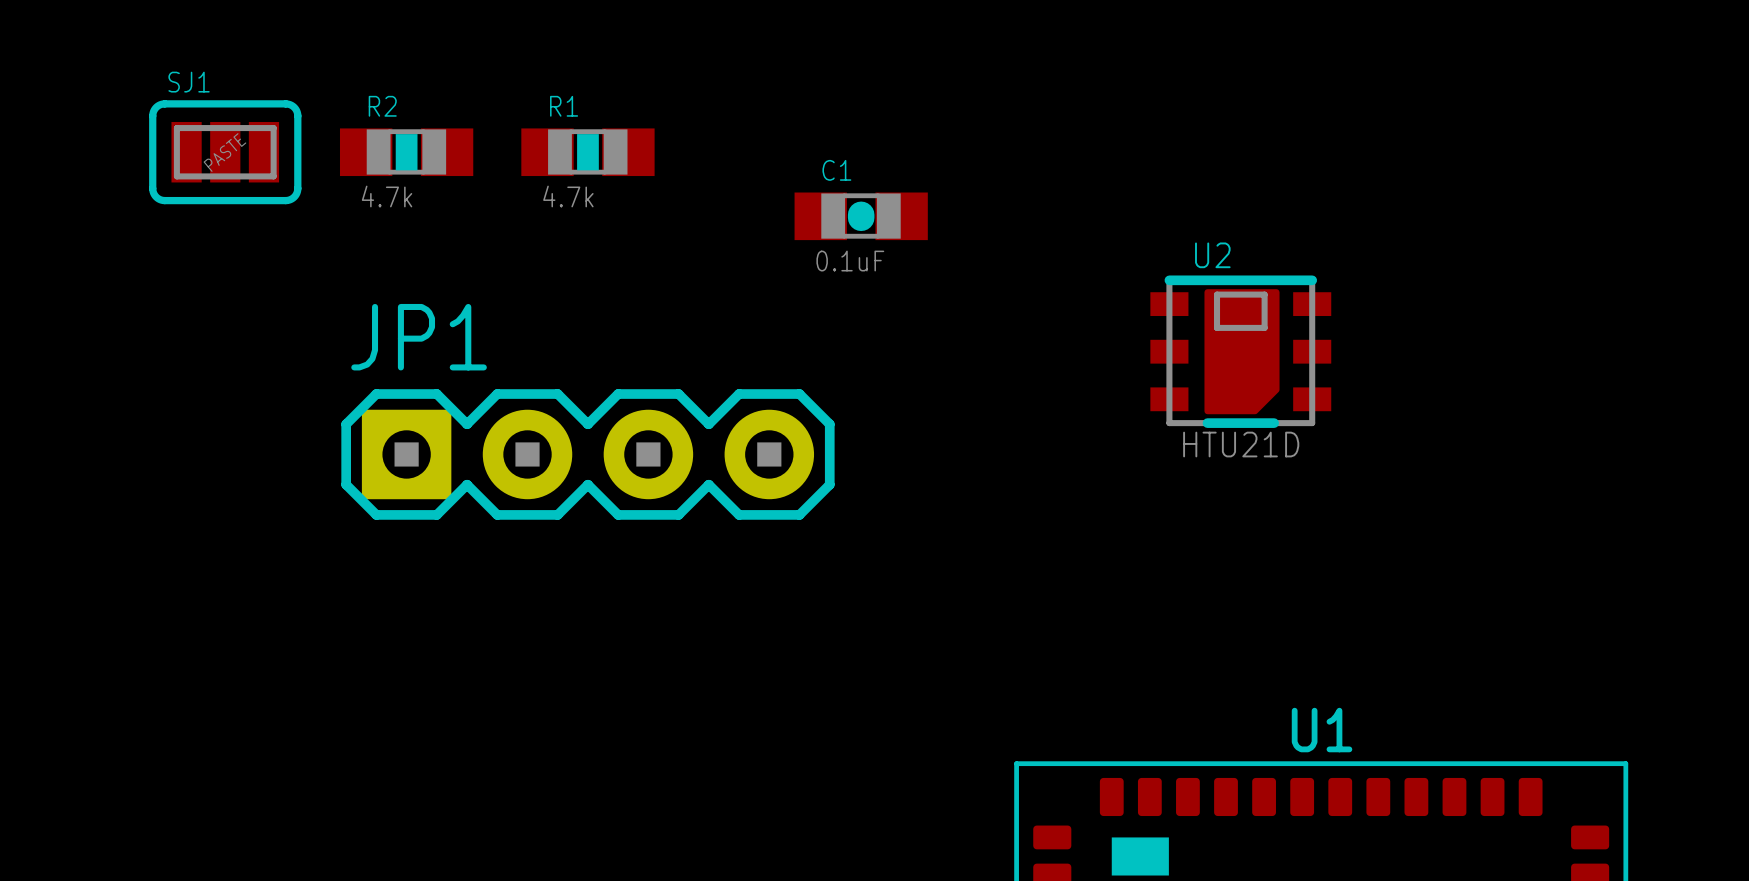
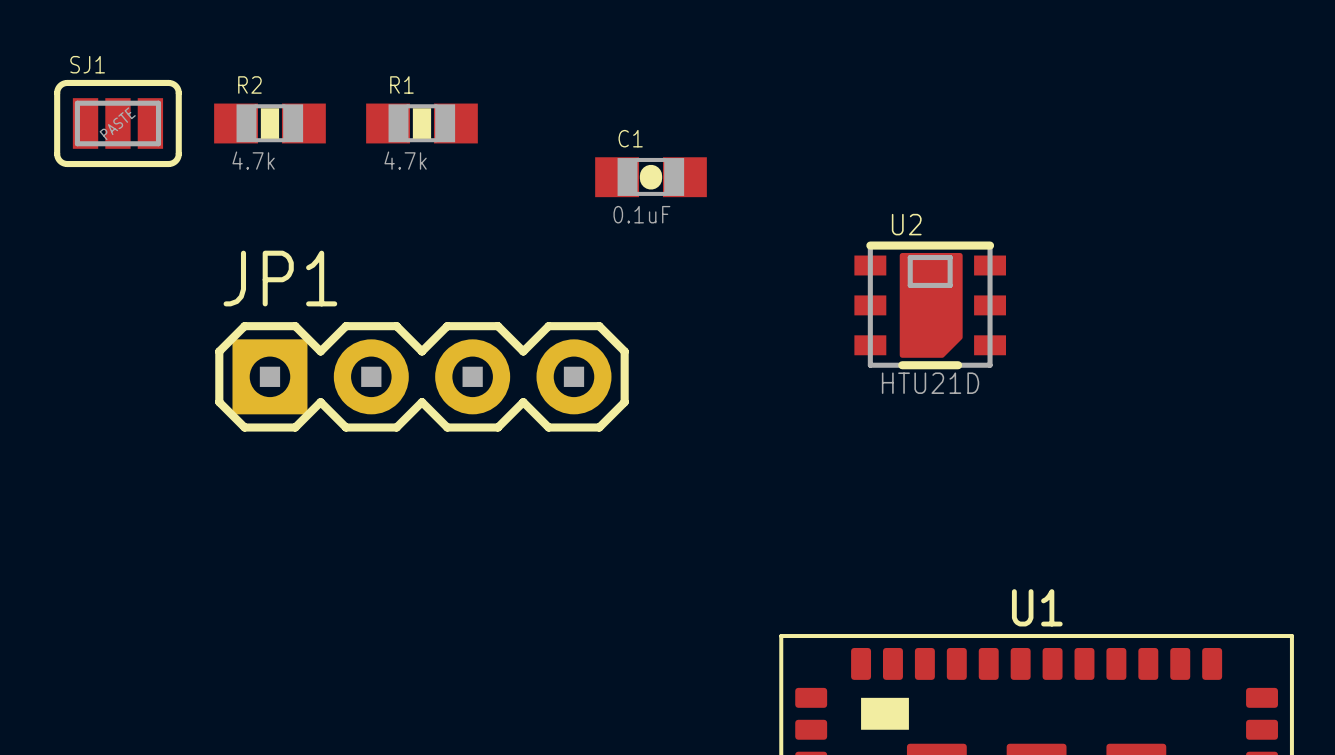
U2 position: (1240, 351) -> (930, 305)

